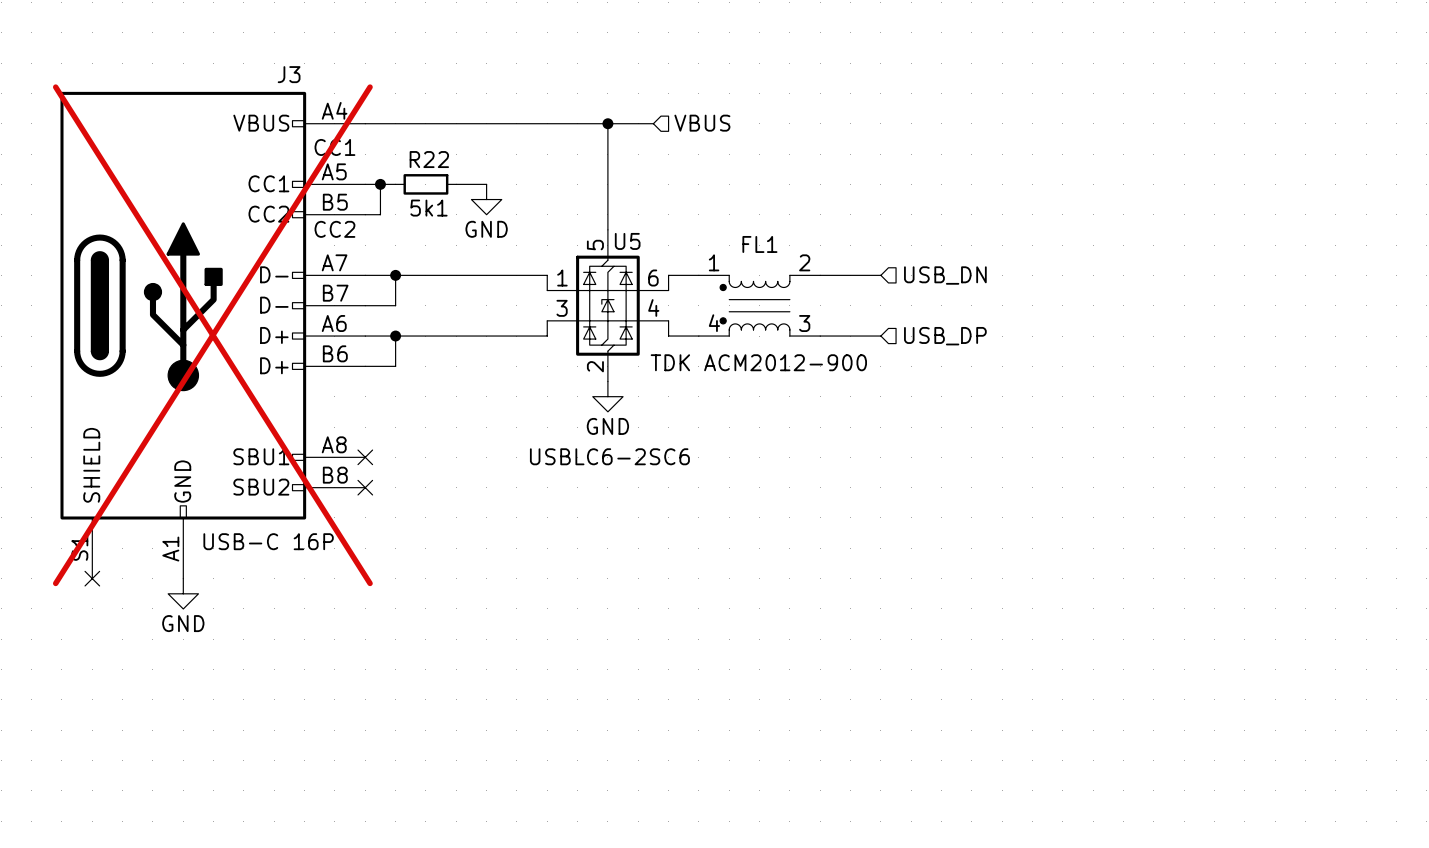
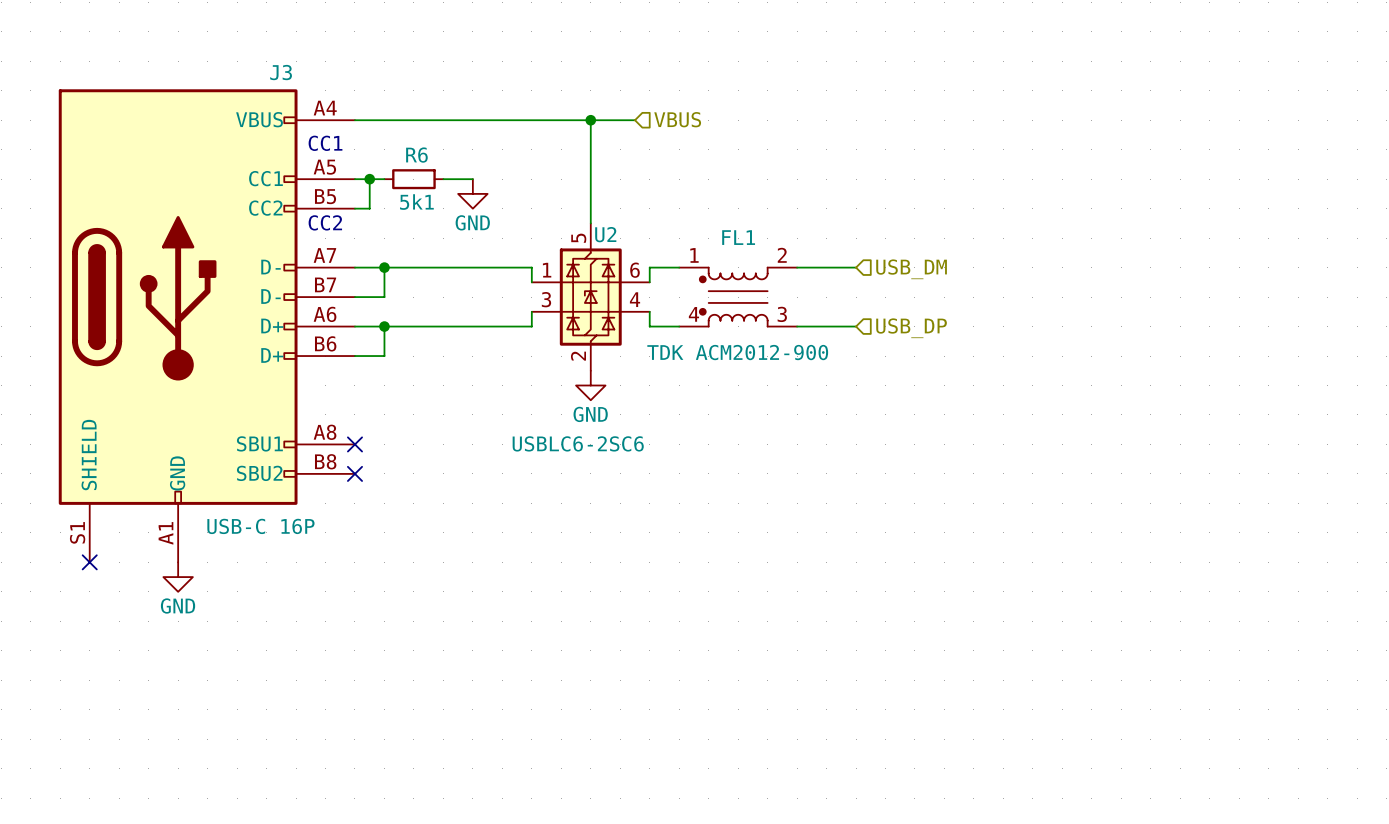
R22 name: R22 (429, 159) -> R6 (416, 155)
U5 name: U5 (627, 241) -> U2 (605, 234)
hierarchical label: USB_DN (945, 275) -> USB_DM (911, 269)
J3 do-not-place cross: (212, 335) -> none

